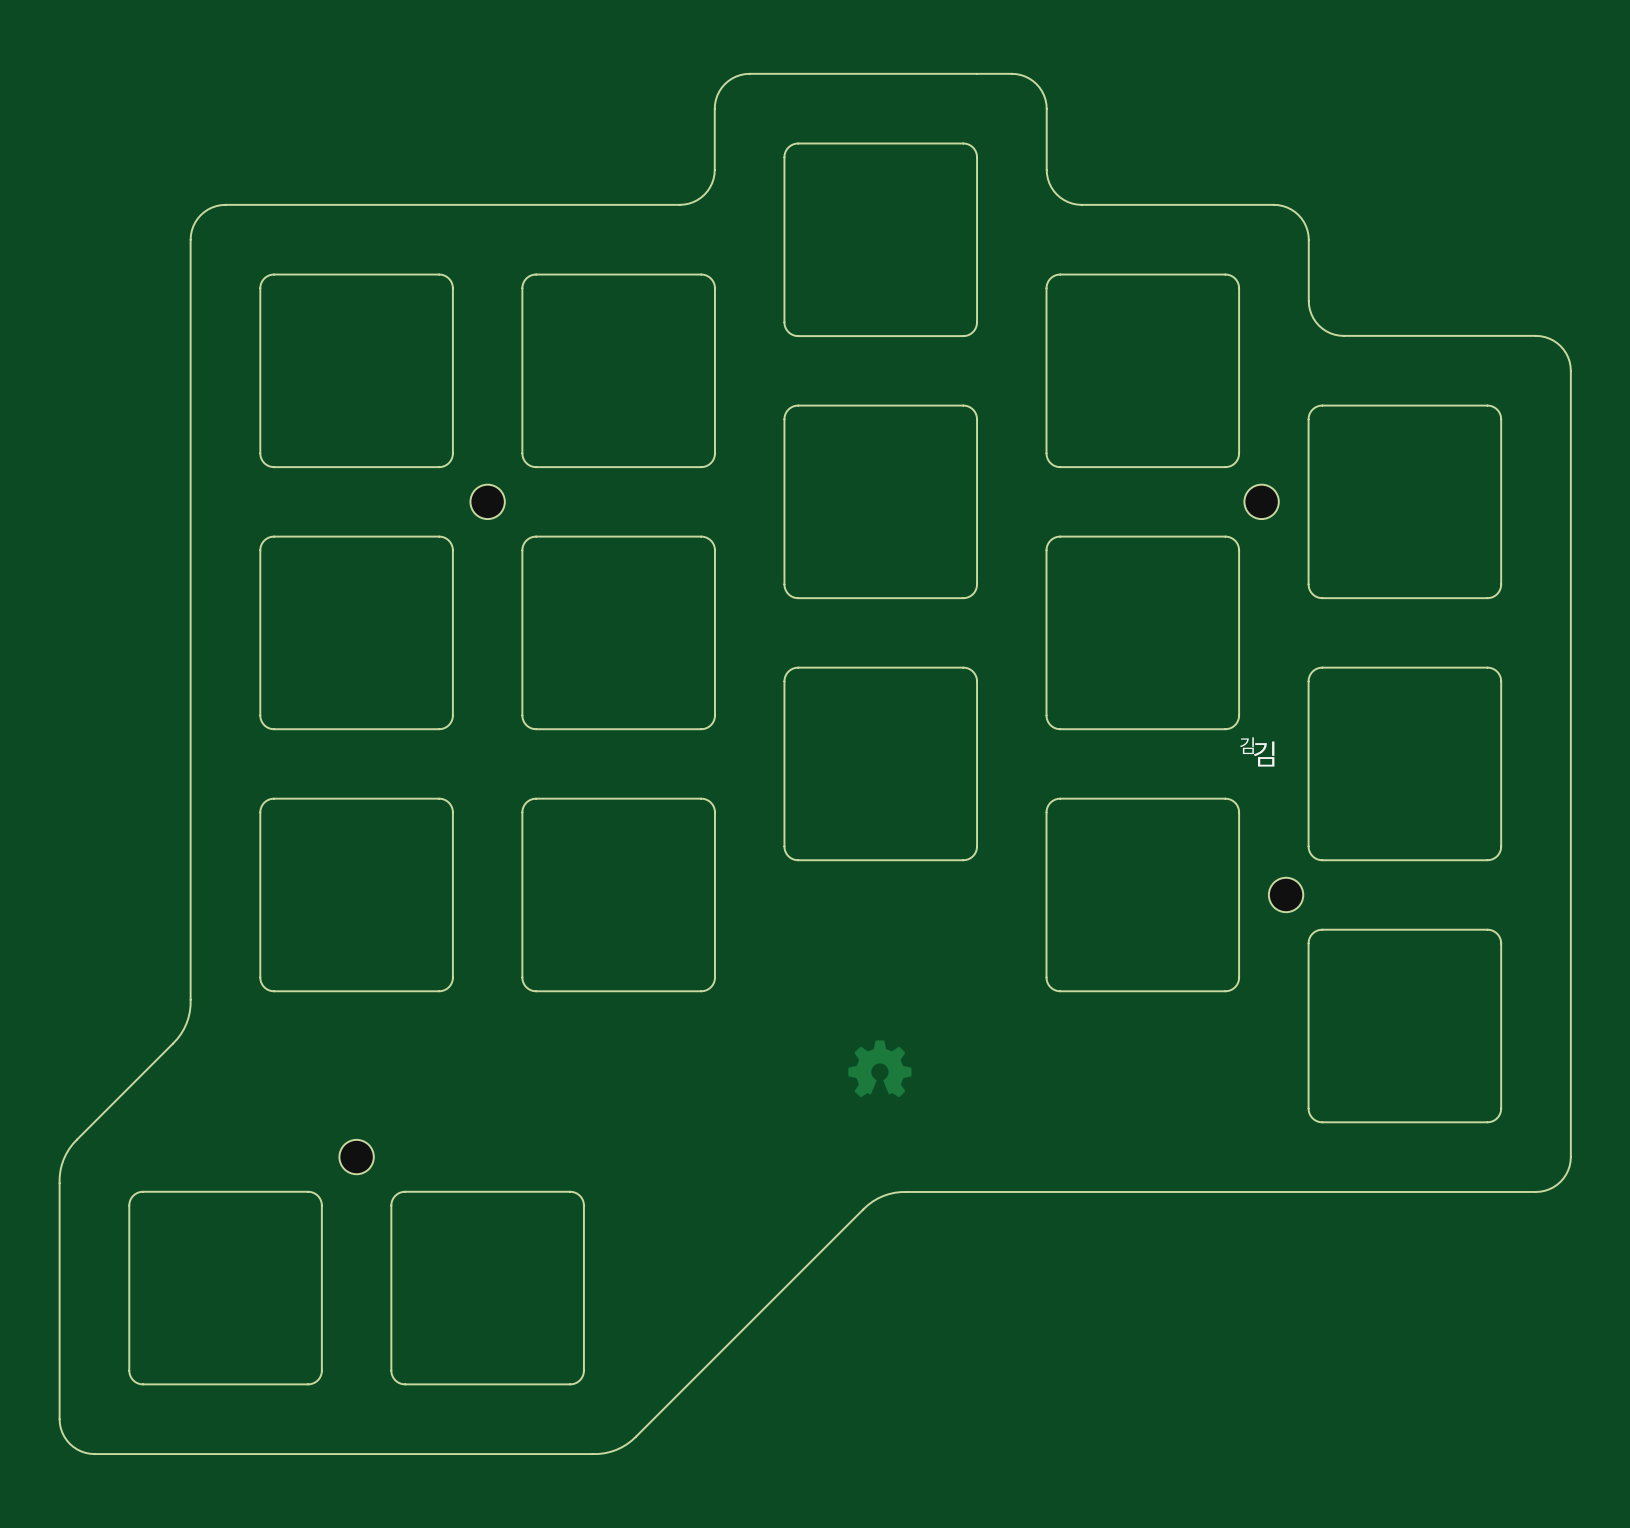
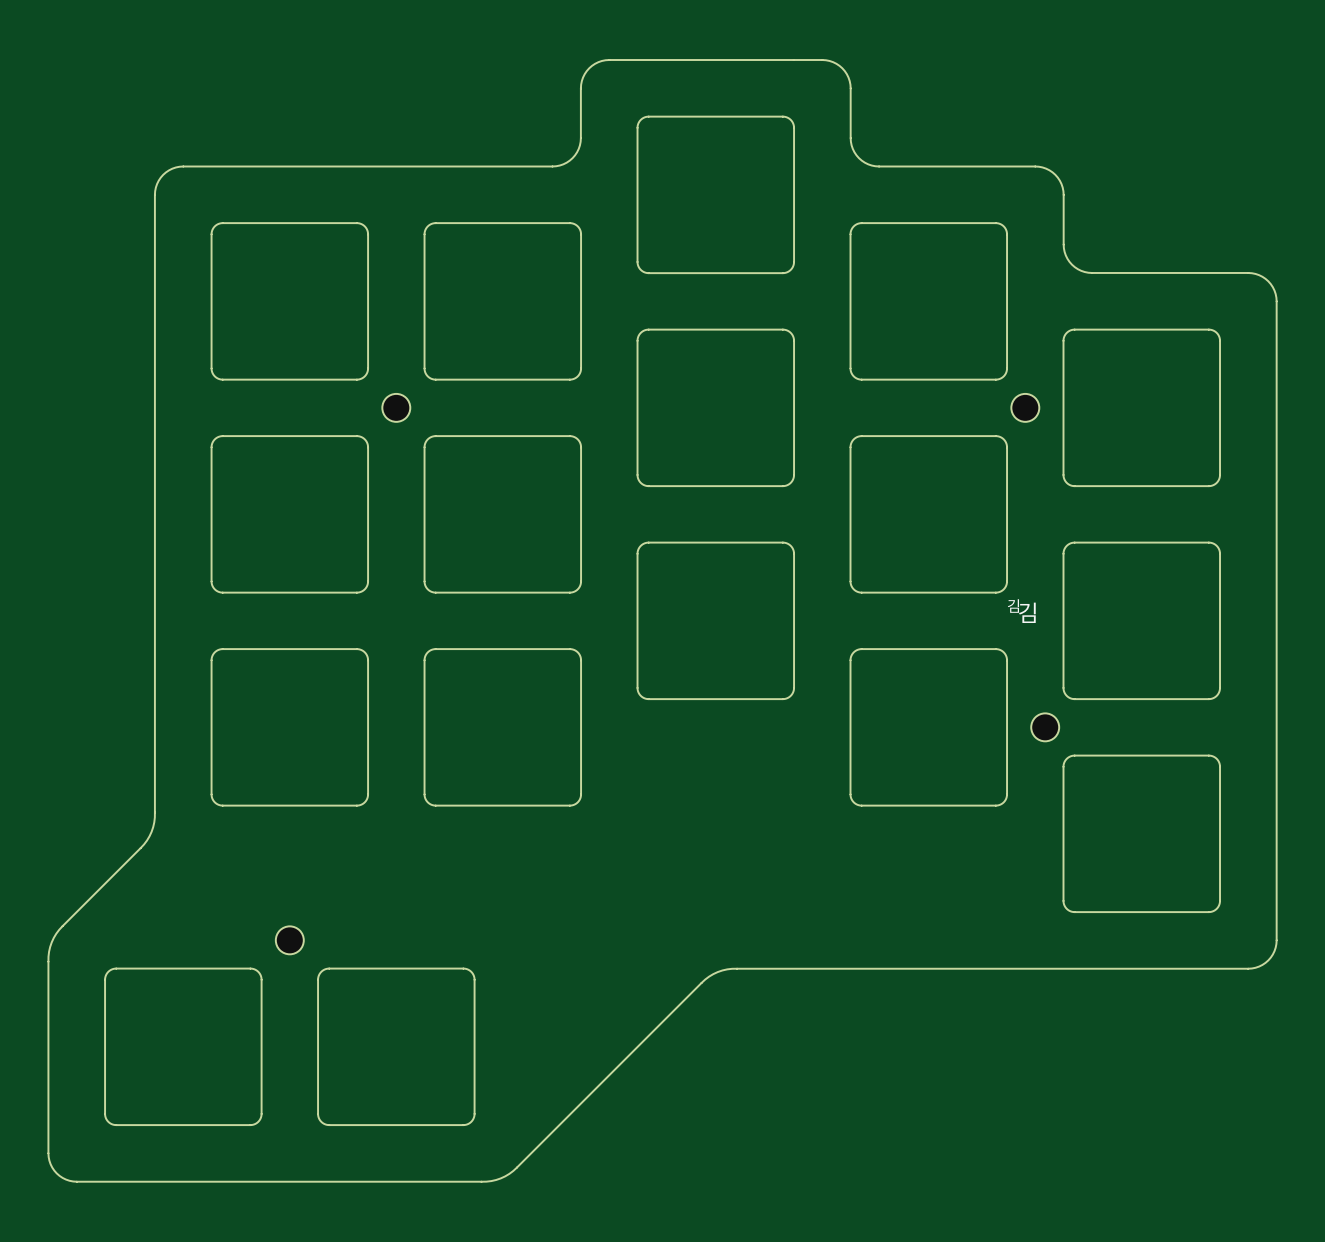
drawing: [848, 1040, 912, 1098] -> none

